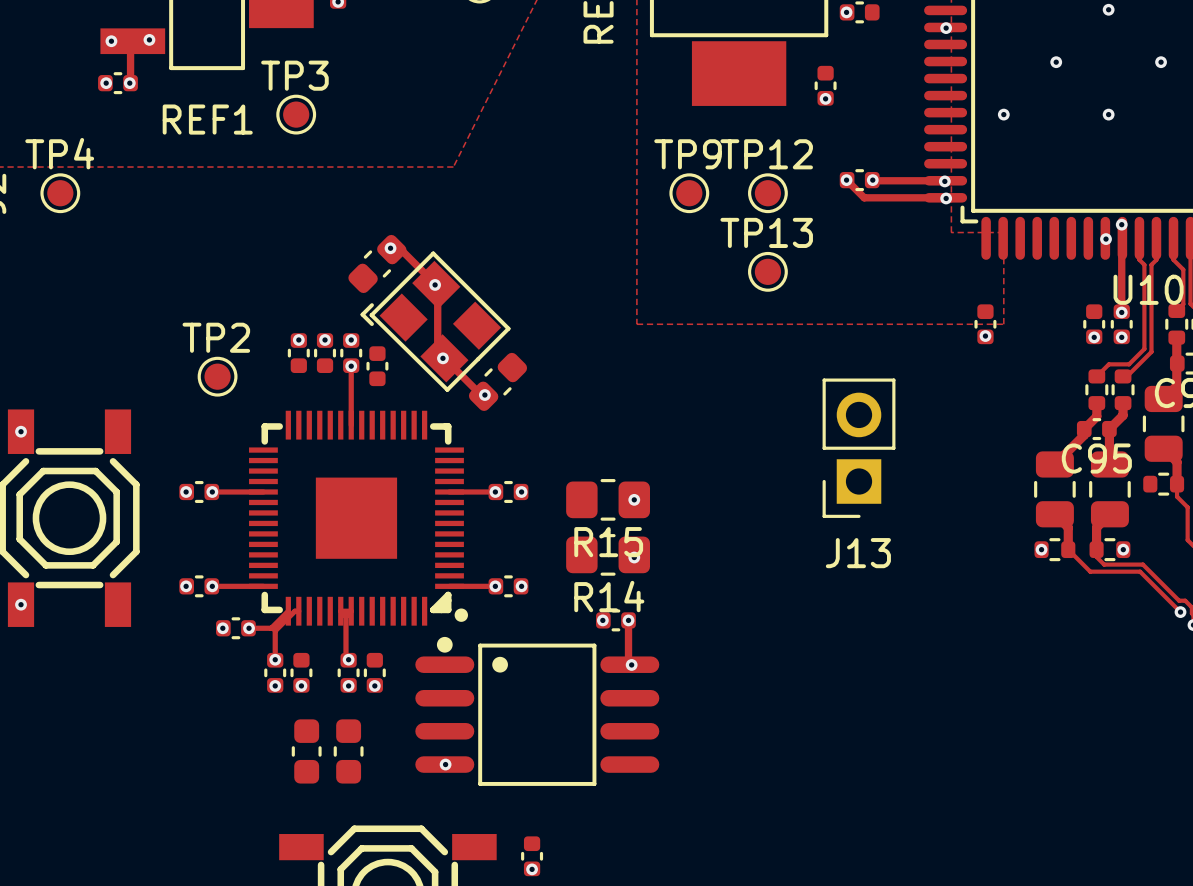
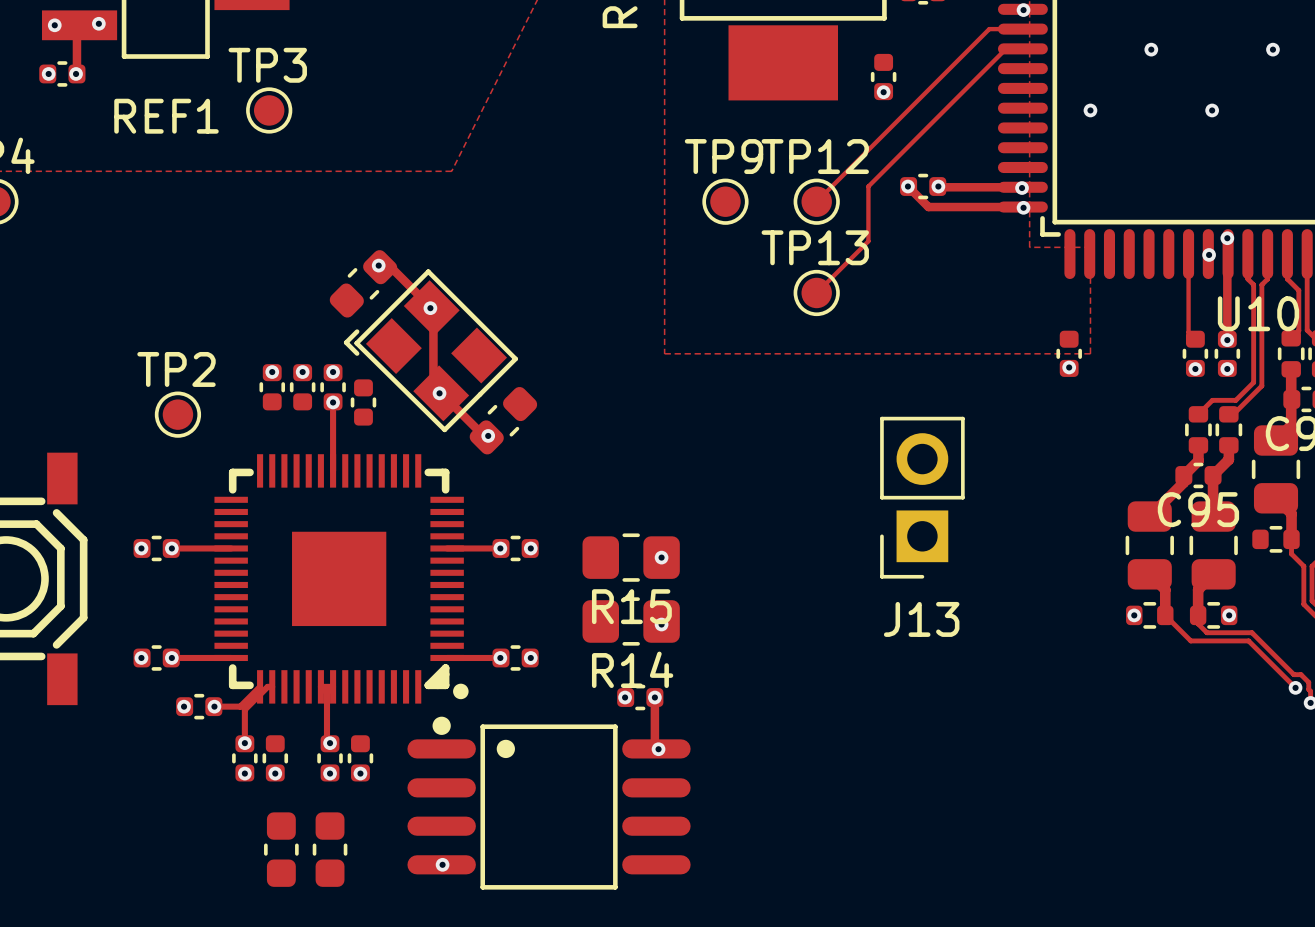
track: none -> (1022, 29) (989, 29) (816, 201)
track: none -> (1022, 48) (1006, 48) (868, 186) (868, 241) (816, 292)
track: none -> (1188, 254) (1188, 332) (1195, 339)

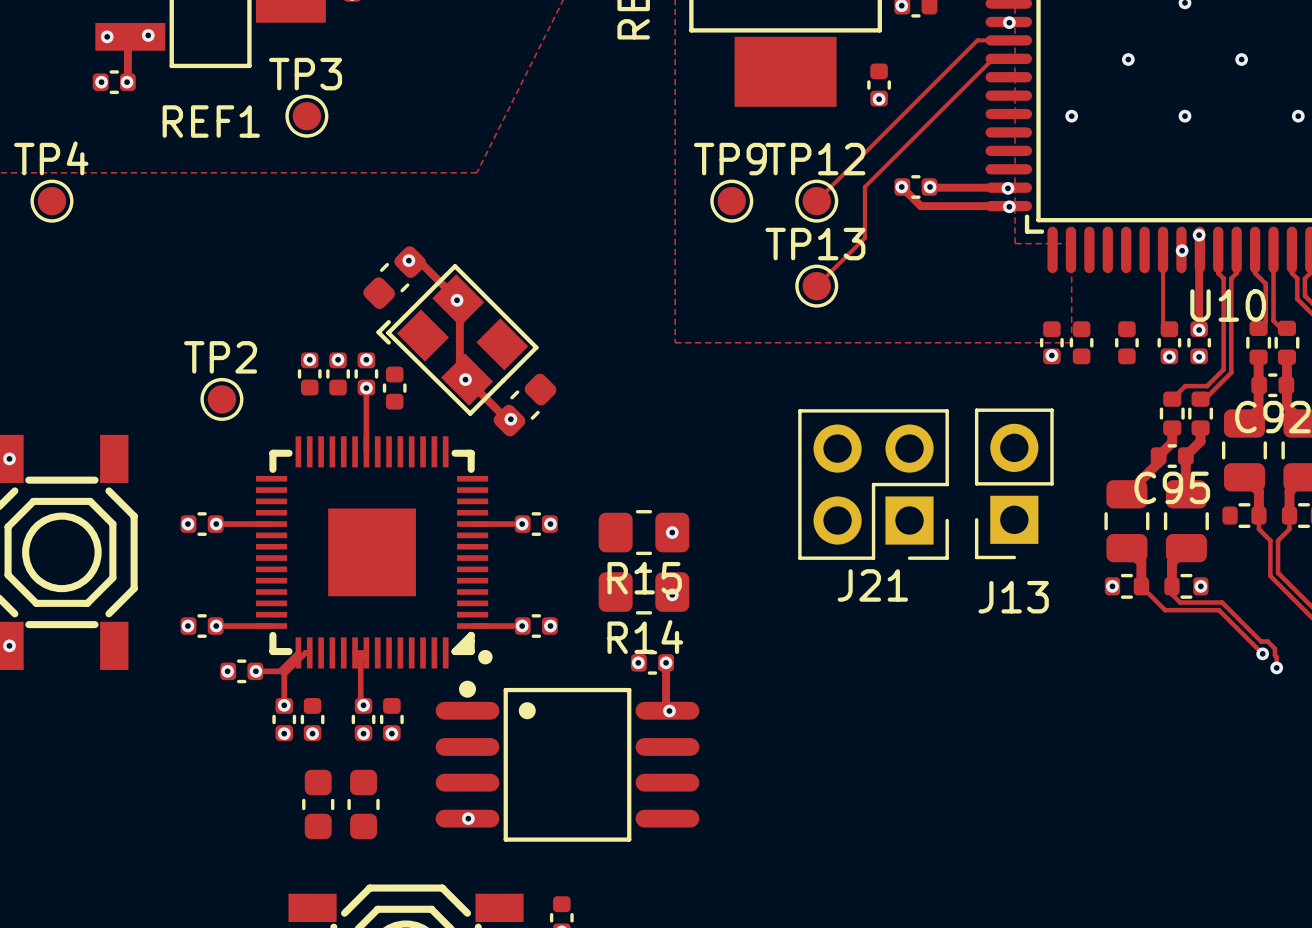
part: none -> (1081, 342)
part: none -> (1126, 342)
J13 position: (922, 497) -> (1014, 483)
J21: none -> (873, 484)

